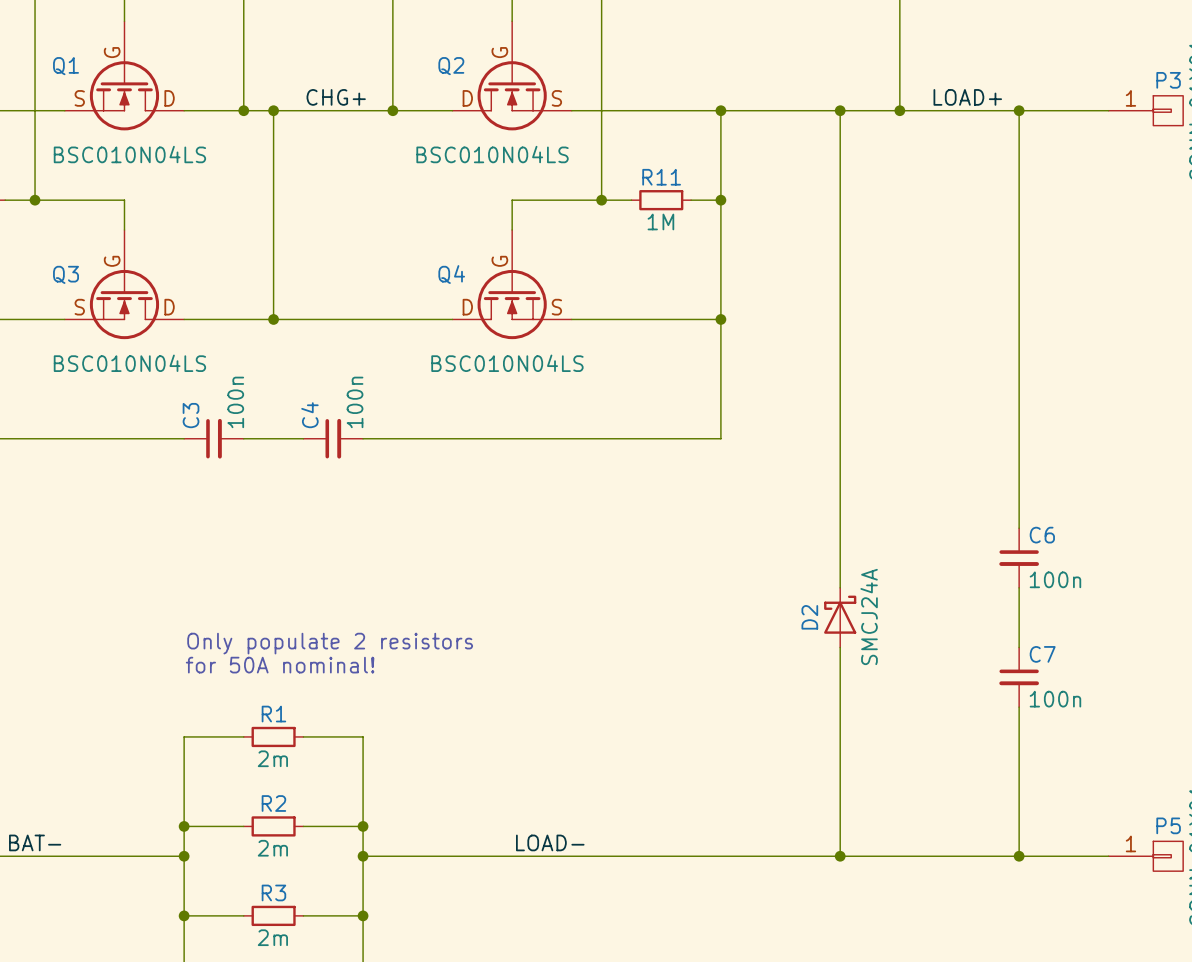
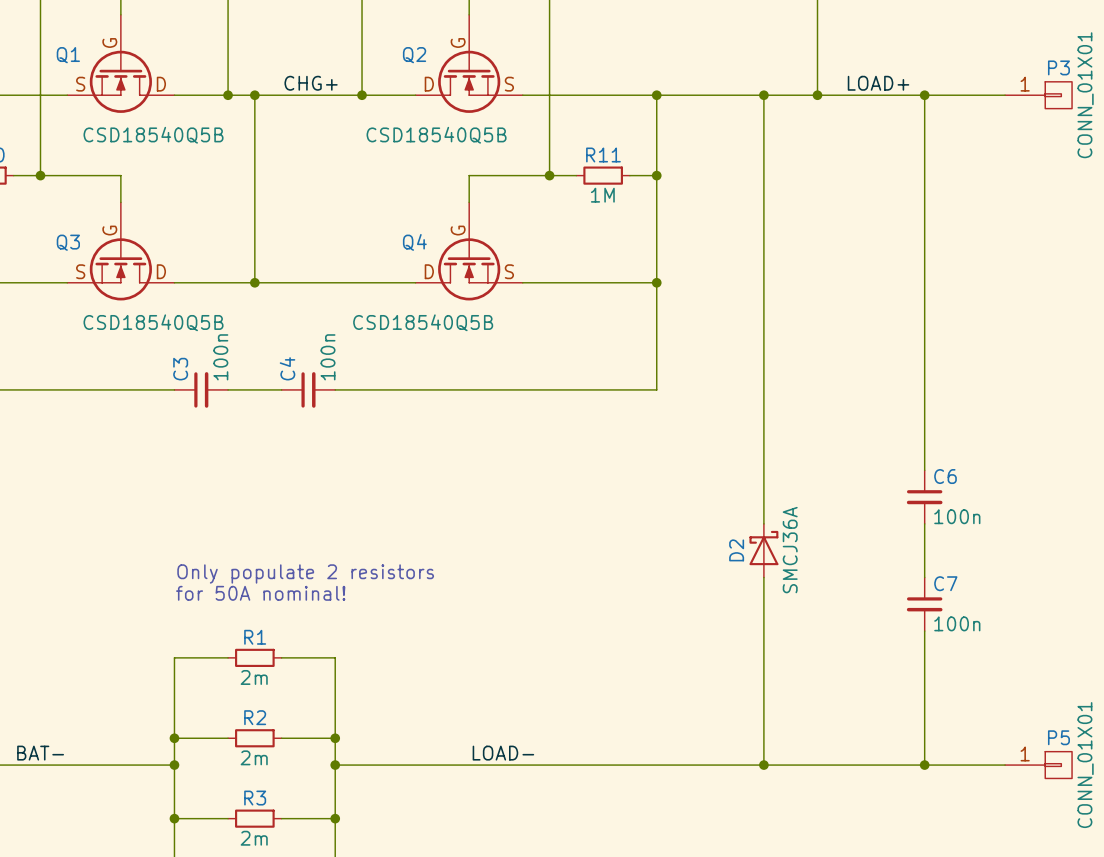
Q1 value: BSC010N04LS (129, 154) -> CSD18540Q5B (153, 135)
Q2 value: BSC010N04LS (492, 154) -> CSD18540Q5B (436, 135)
Q3 value: BSC010N04LS (129, 363) -> CSD18540Q5B (153, 322)
Q4 value: BSC010N04LS (507, 363) -> CSD18540Q5B (423, 322)
D2 value: SMCJ24A (869, 616) -> SMCJ36A (790, 550)

